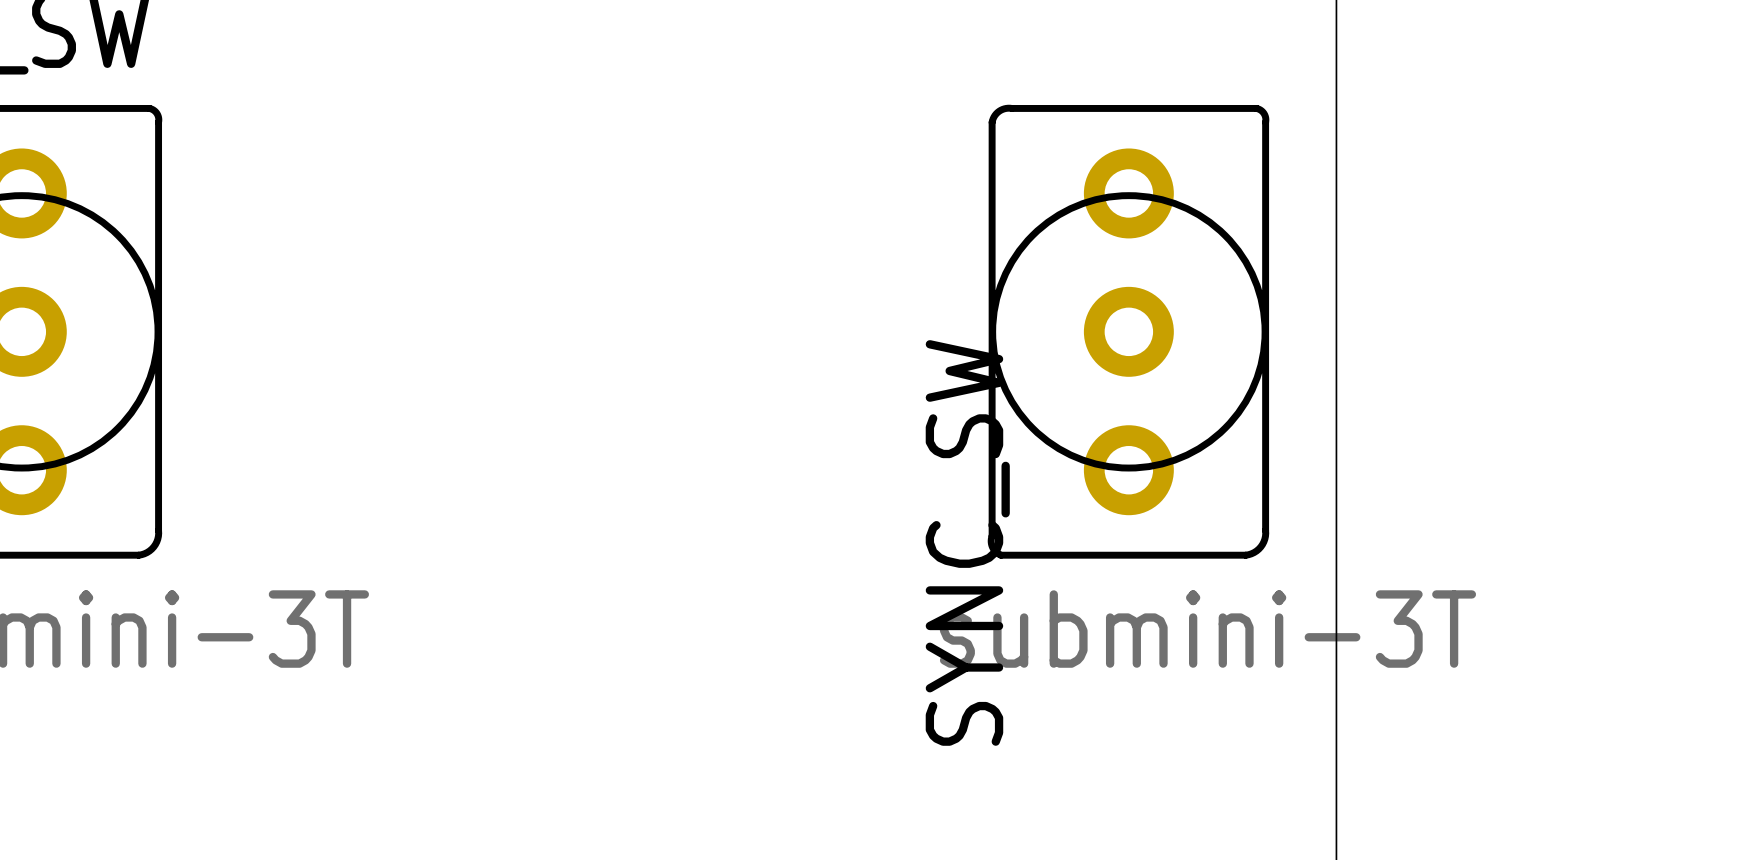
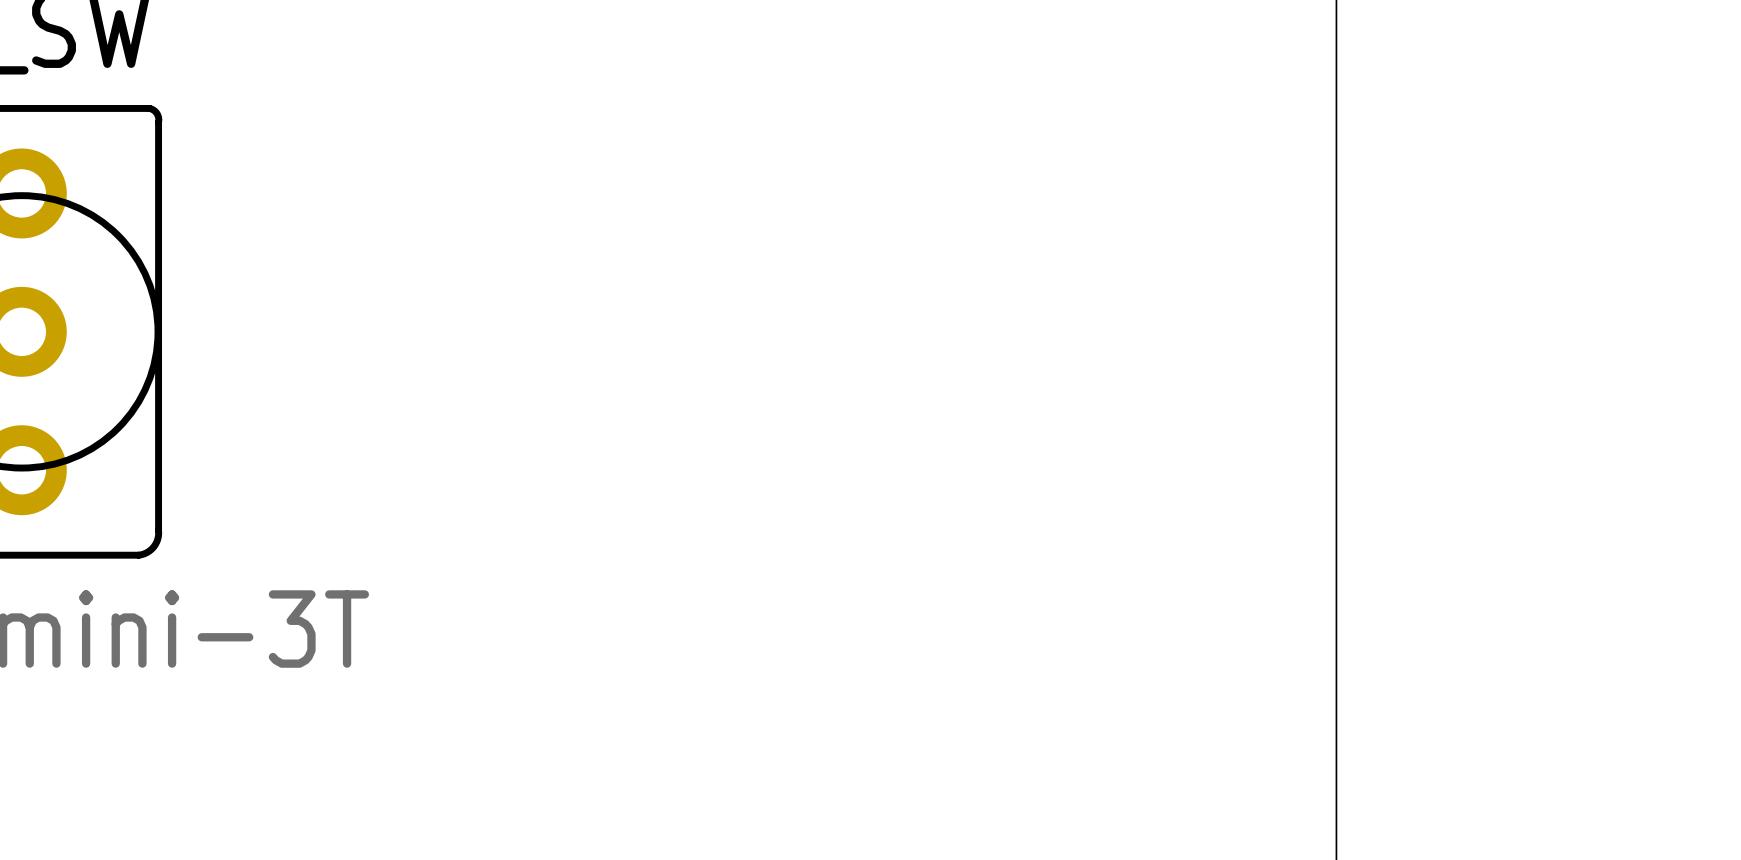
SYNC_SW: submini-3T (1128, 331) -> none

